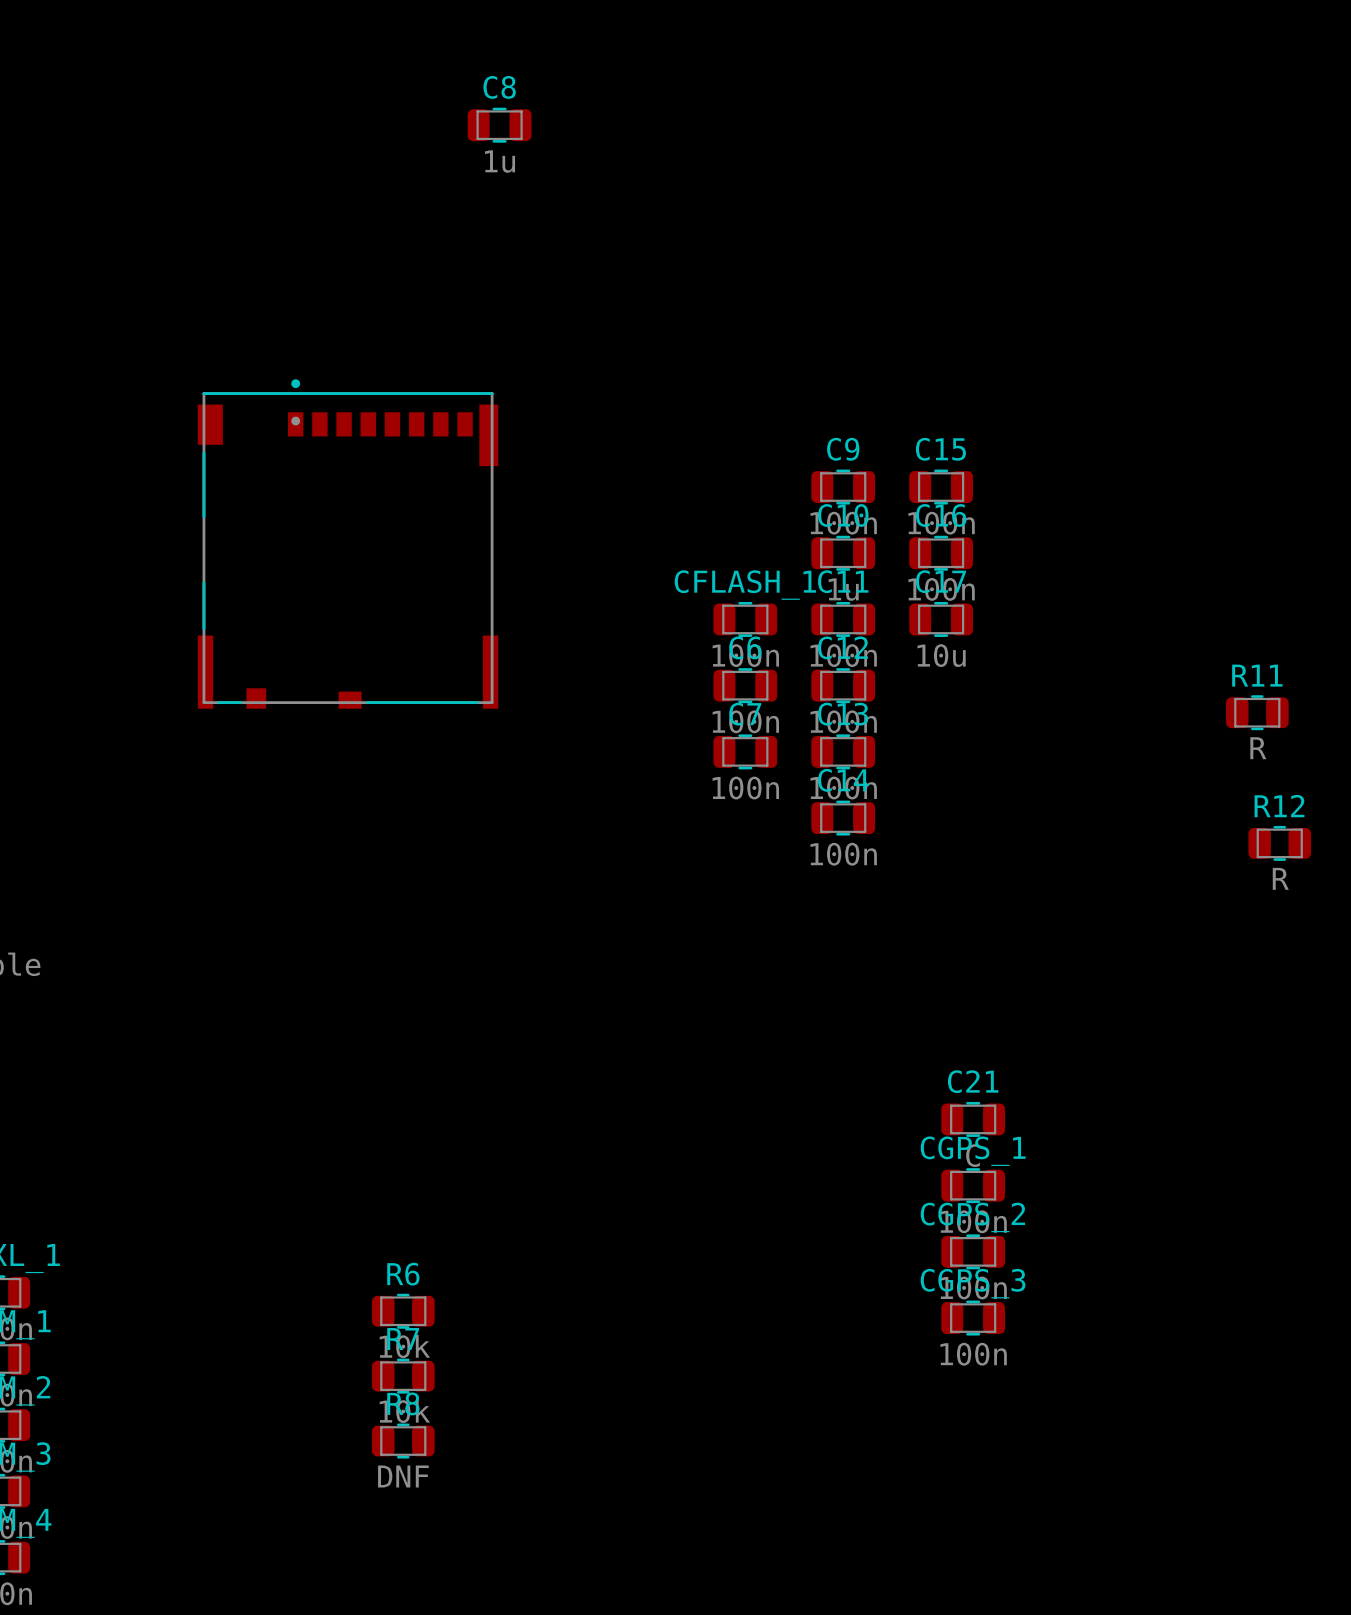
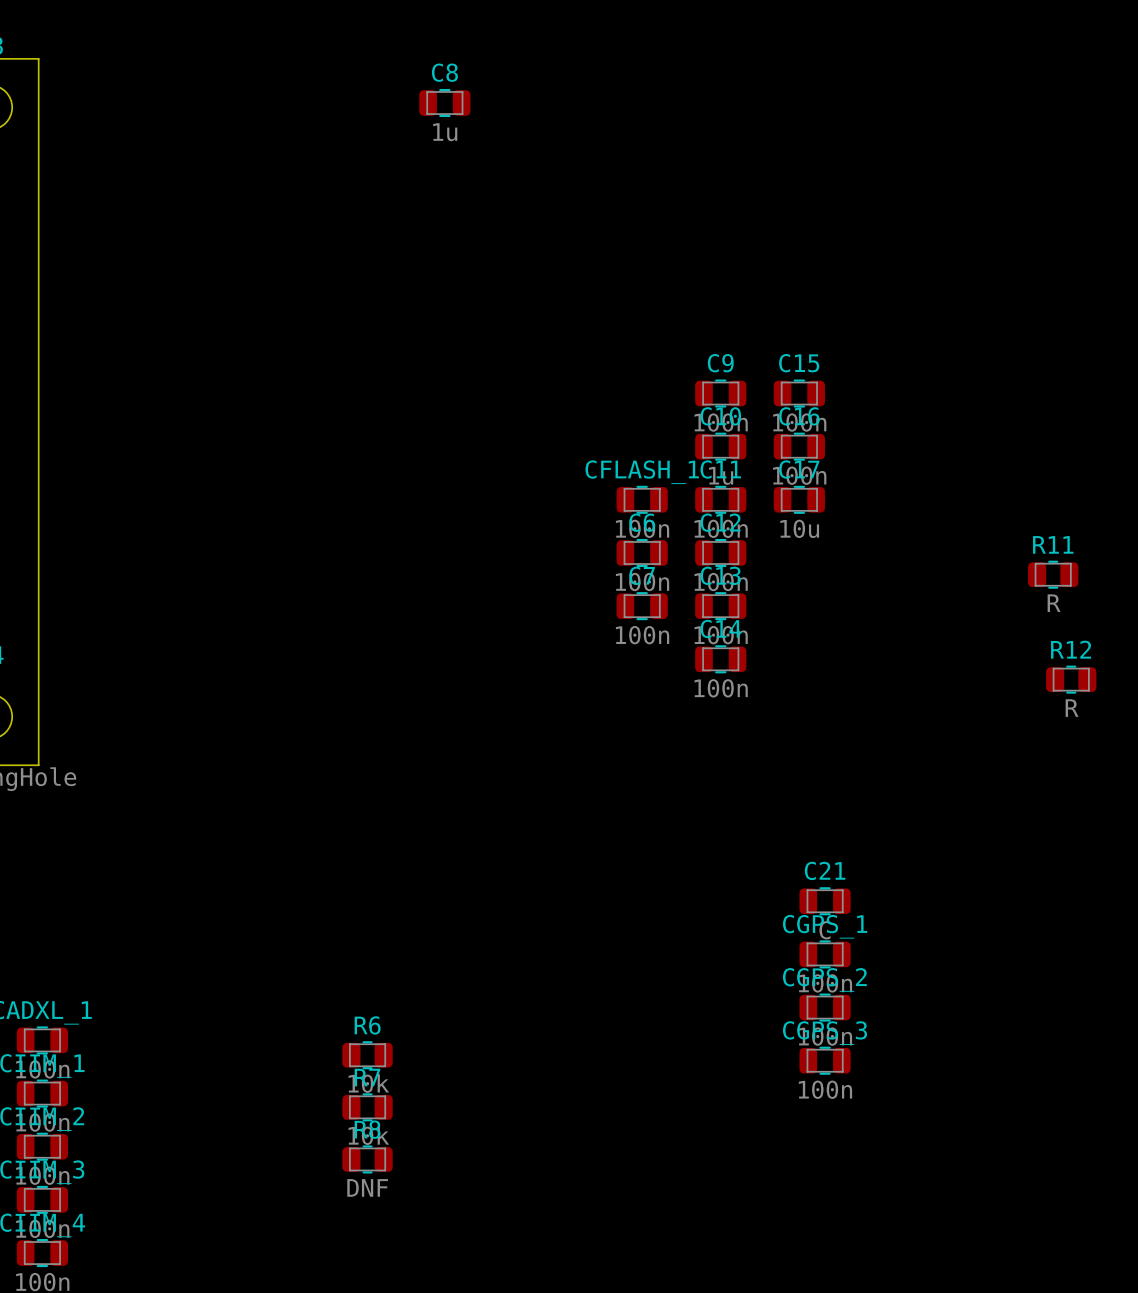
part: (348, 544) -> none

